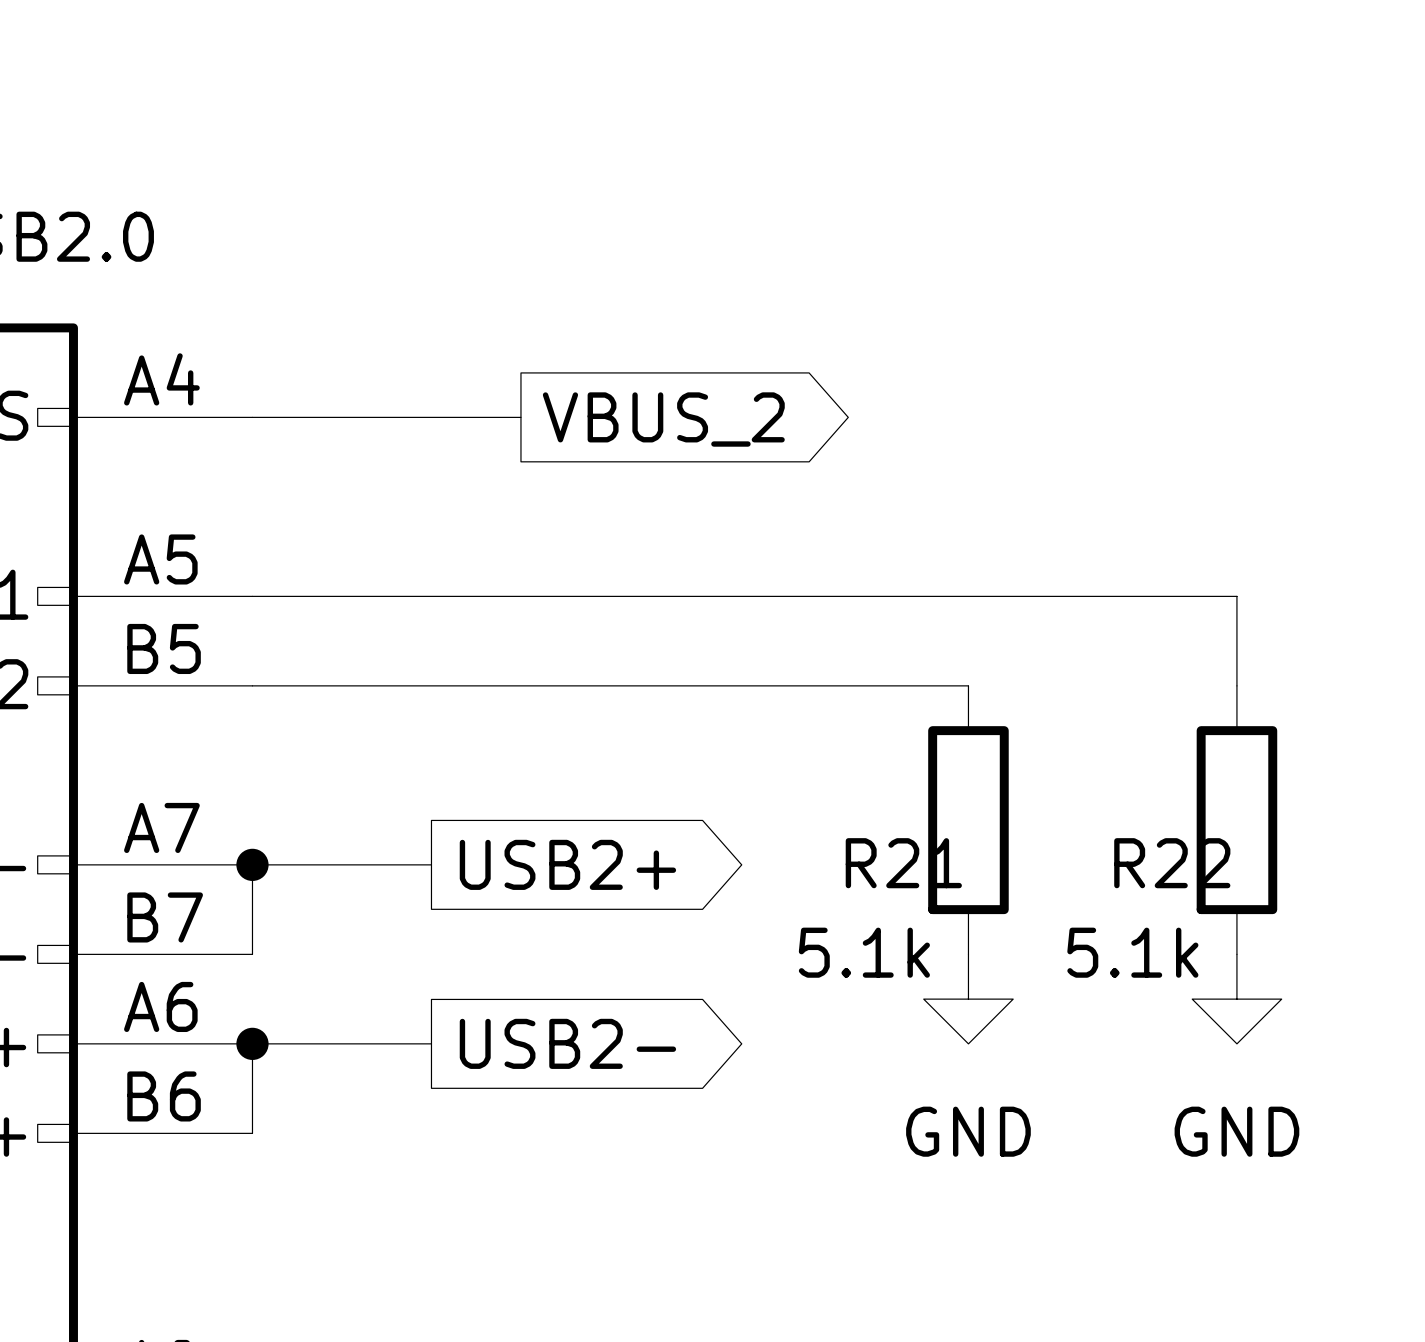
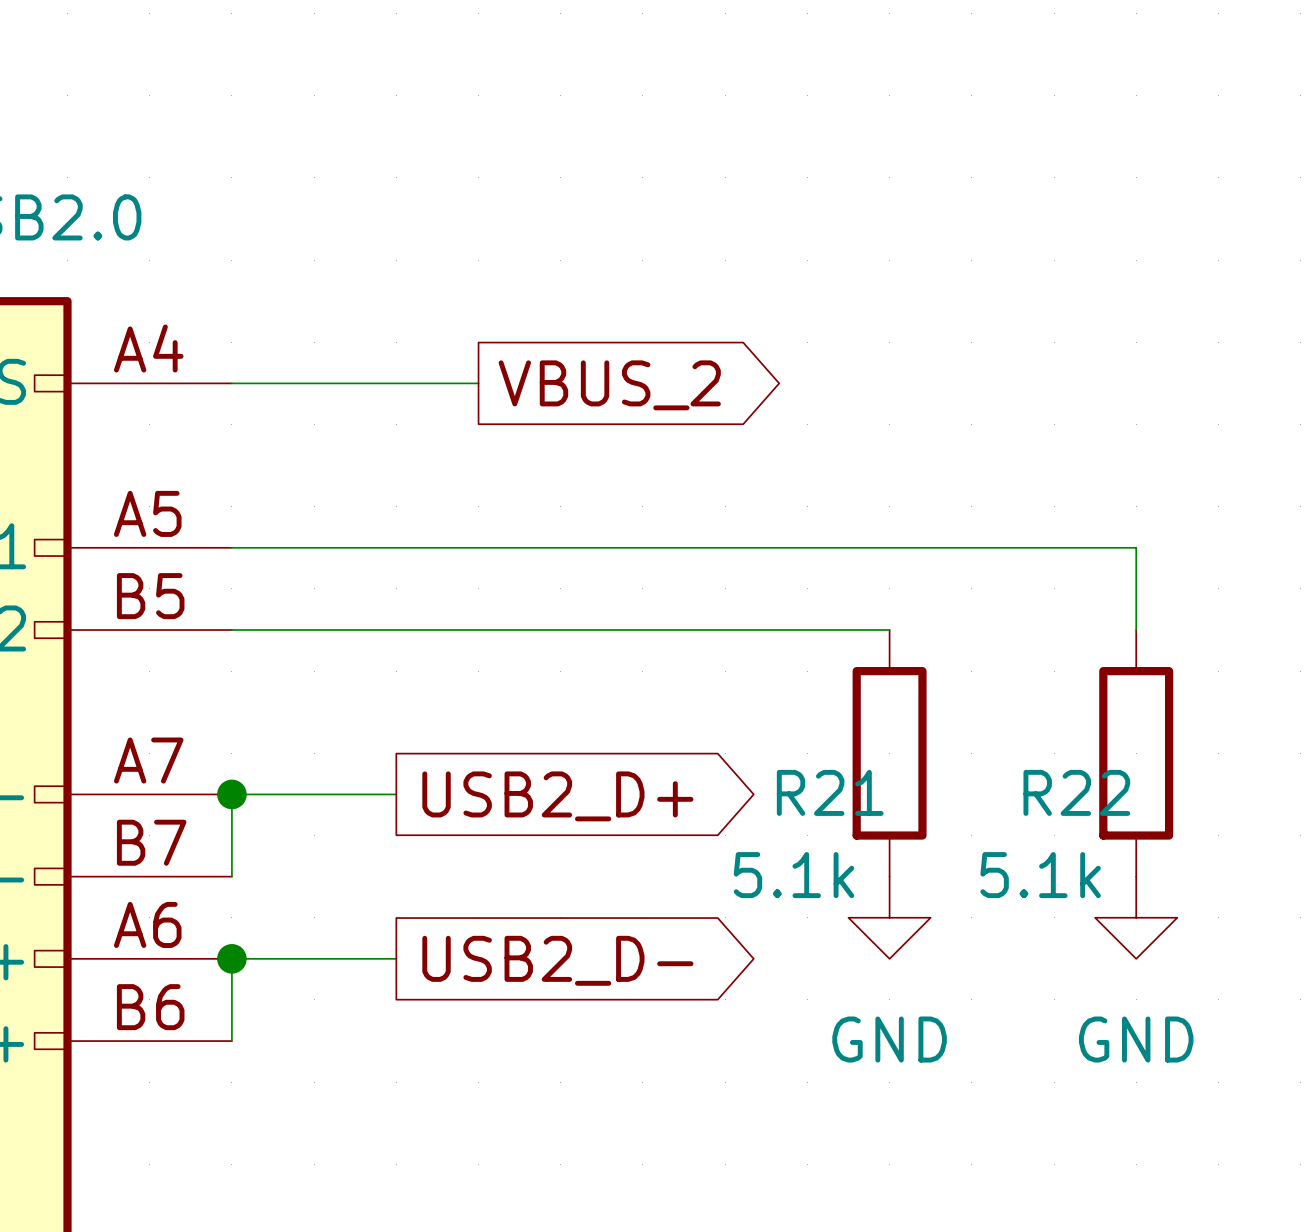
global label: USB2+ (567, 864) -> USB2_D+ (557, 796)
global label: USB2- (567, 1043) -> USB2_D- (557, 960)

